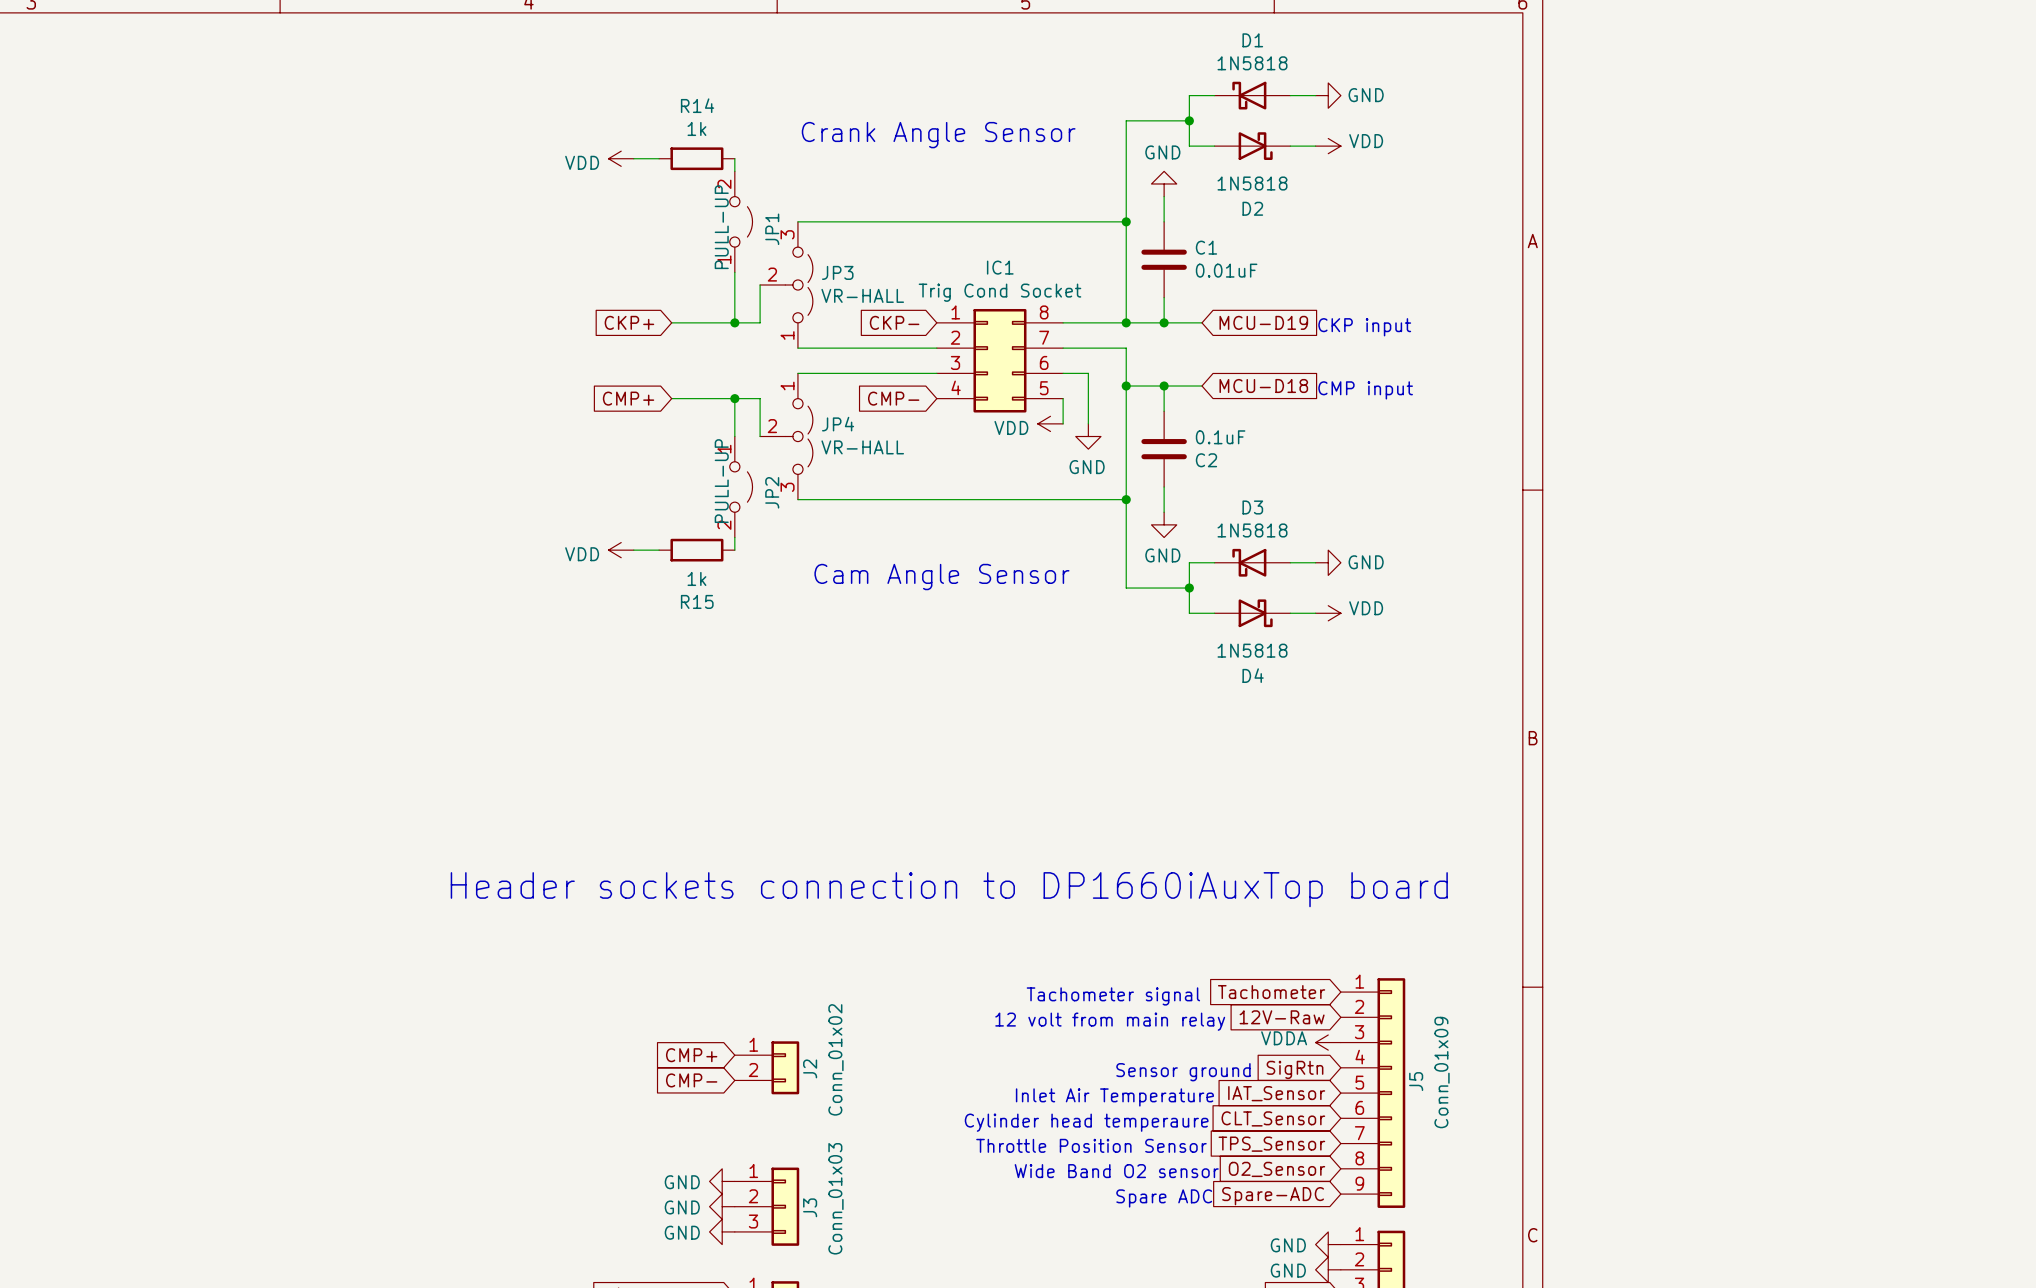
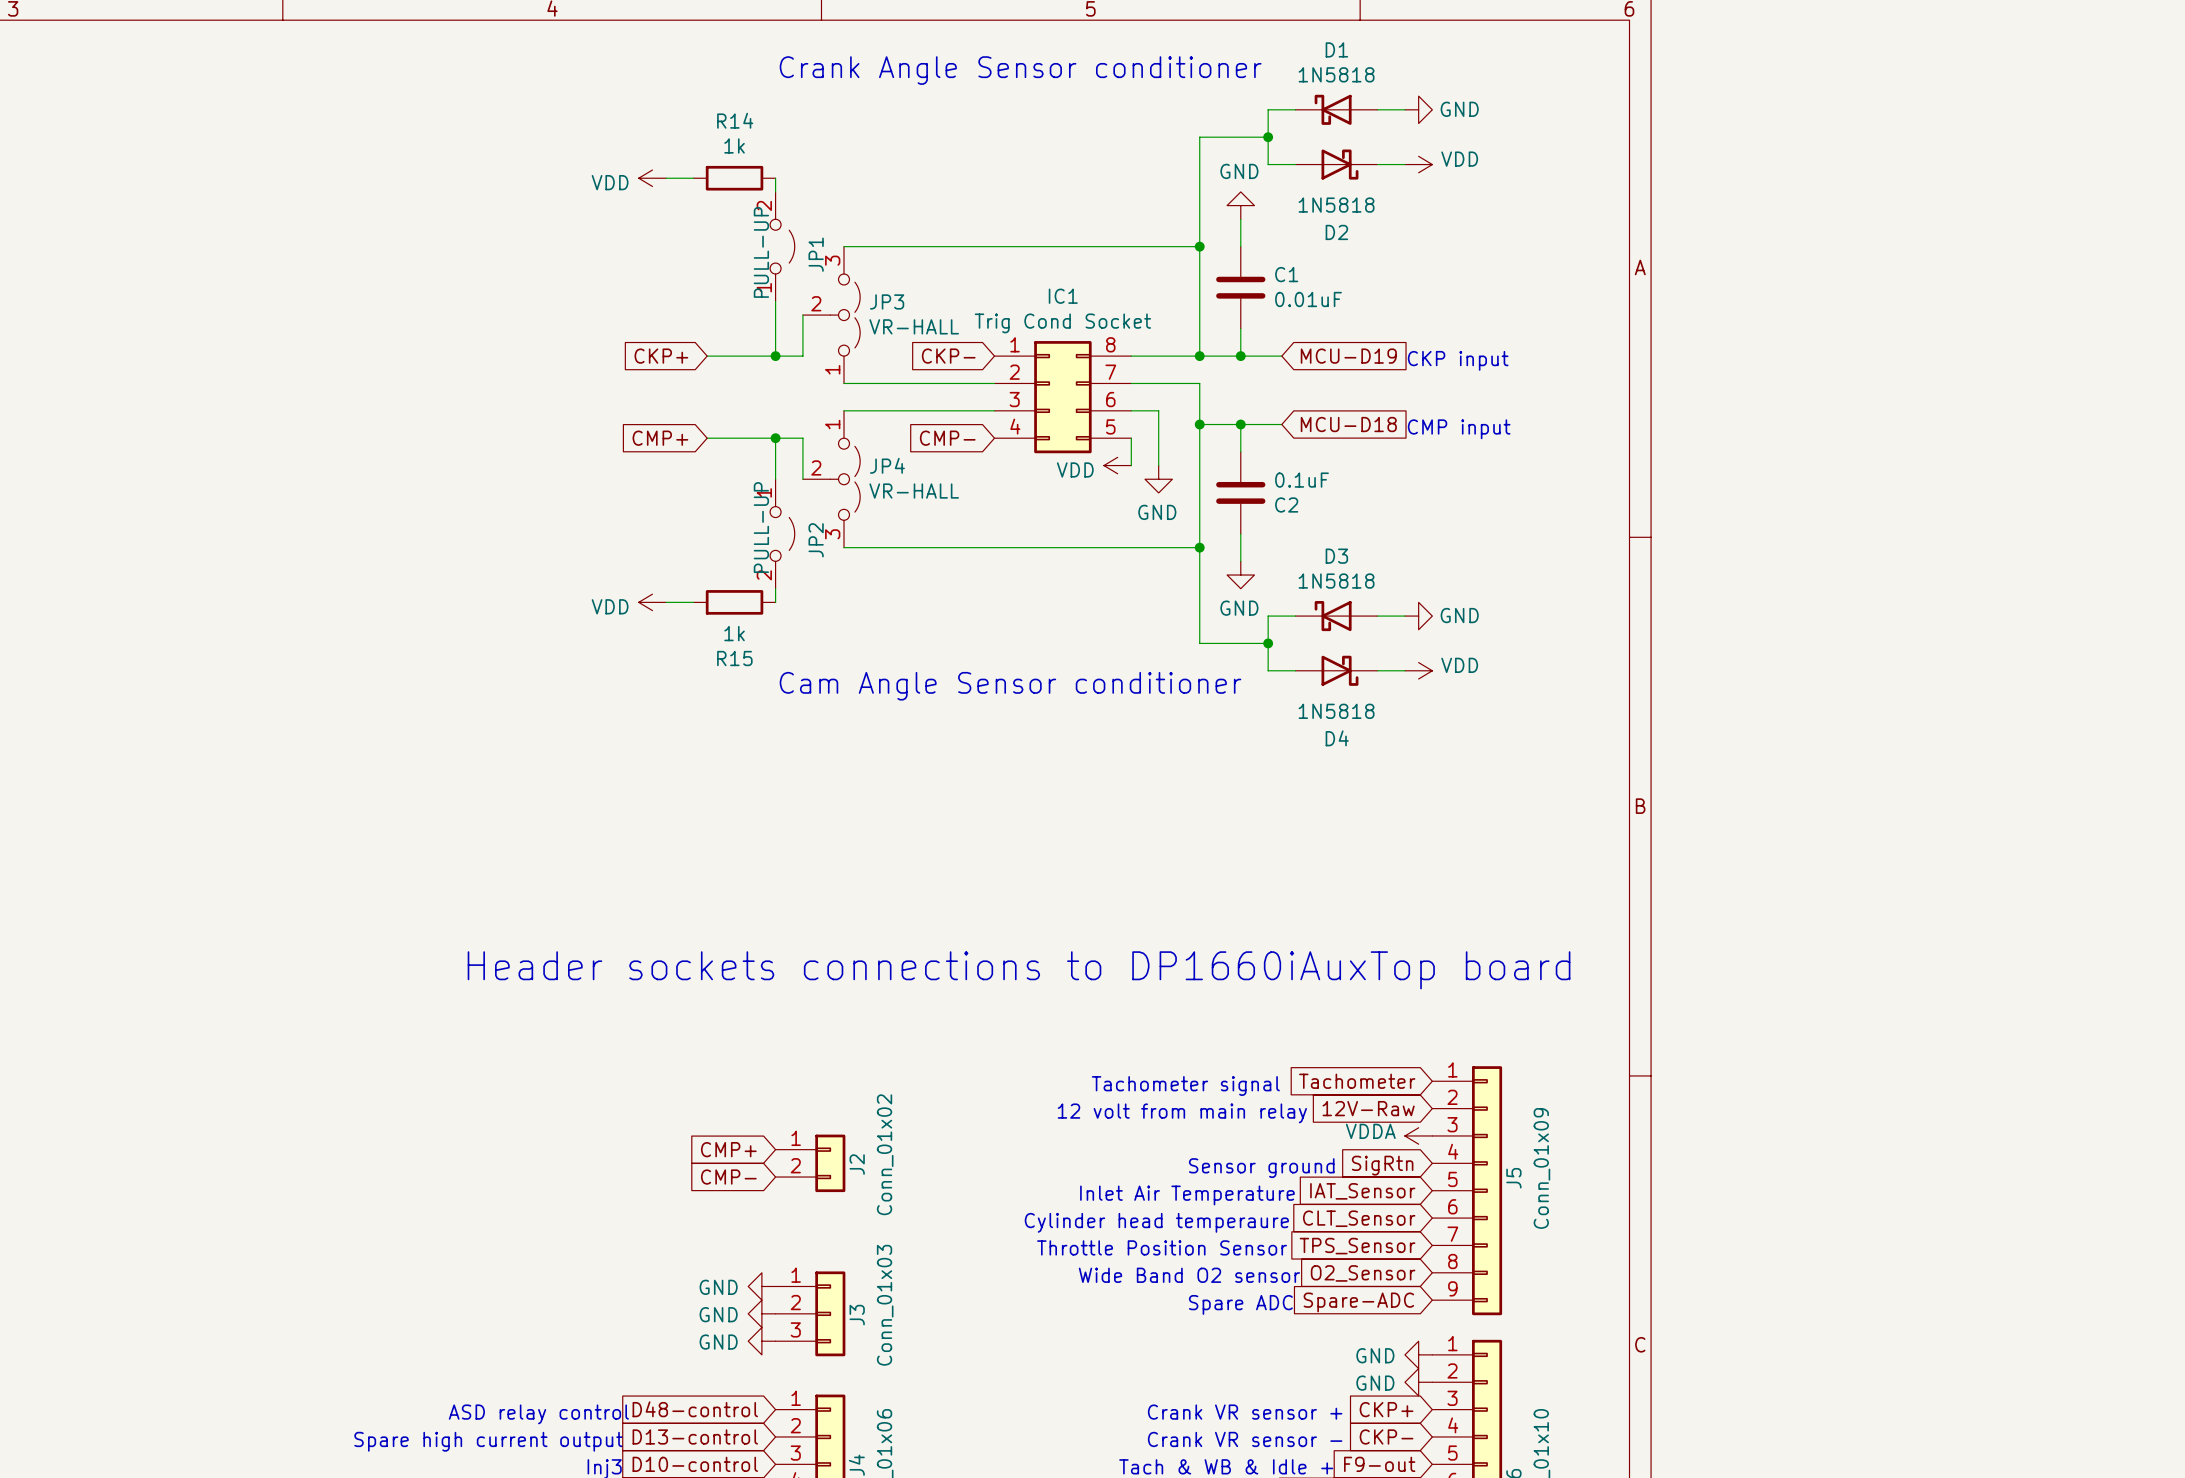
text: none -> Crank Angle Sensor conditioner (1020, 70)
text: Crank Angle Sensor (938, 135) -> none
text: Cam Angle Sensor (941, 577) -> none
text: none -> Cam Angle Sensor conditioner (1010, 686)
text: Header sockets connection to DP1660iAuxTop board (949, 889) -> Header sockets connections to DP1660iAuxTop board (1019, 970)

